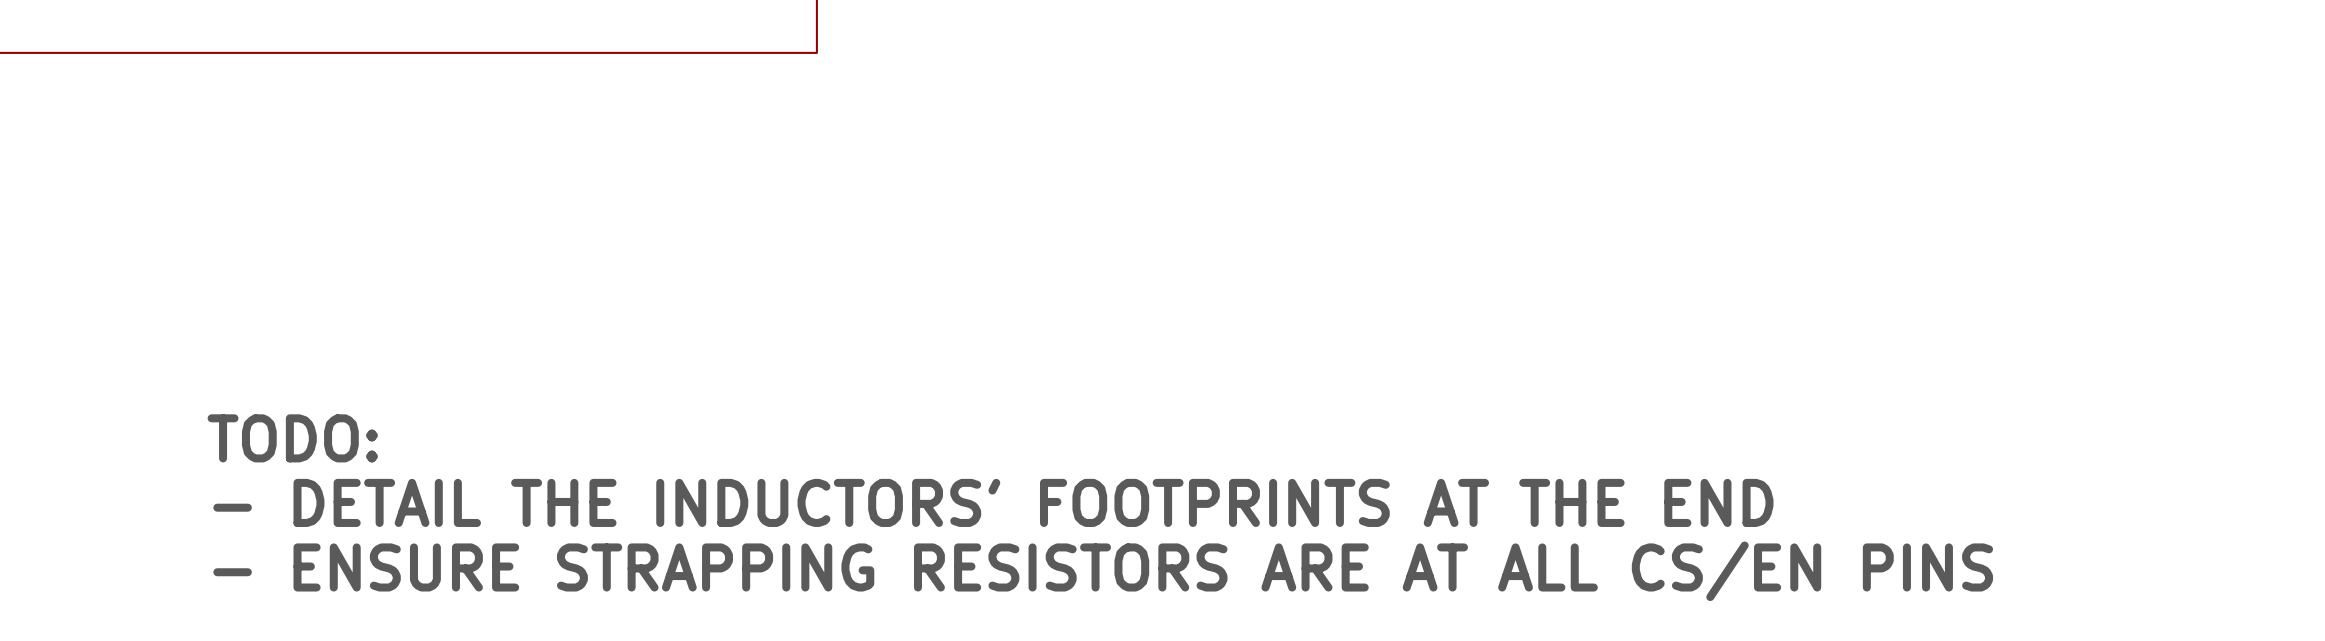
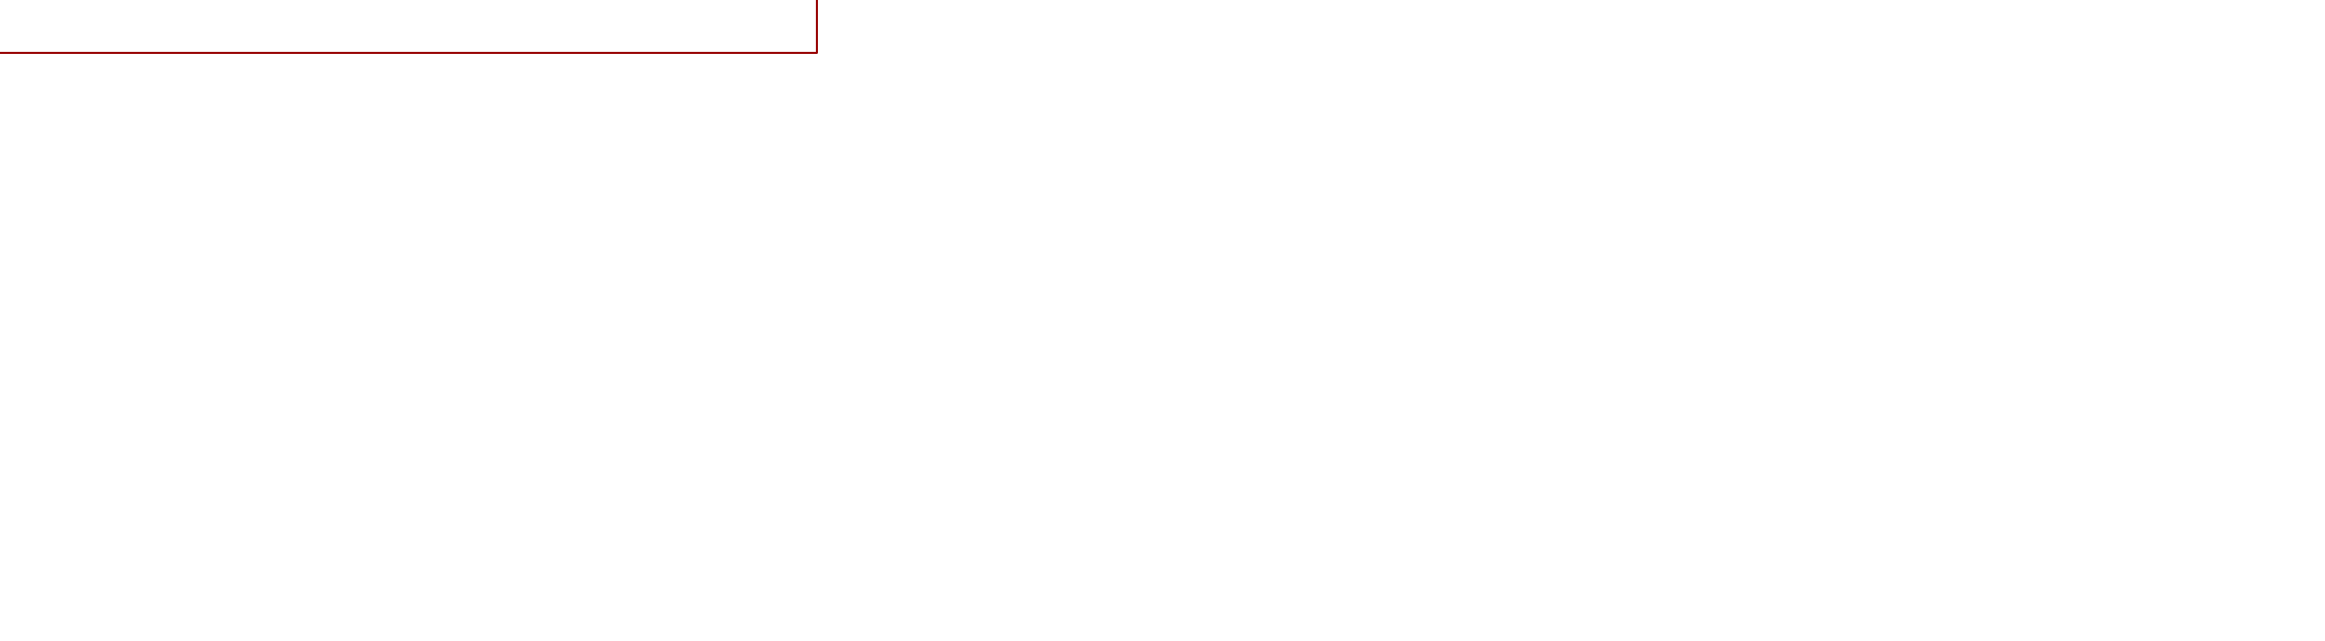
text: TODO: (292, 438) -> none
text: - DETAIL THE INDUCTORS' FOOTPRINTS AT THE END (993, 502) -> none
text: - ENSURE STRAPPING RESISTORS ARE AT ALL CS/EN PINS (1103, 571) -> none

